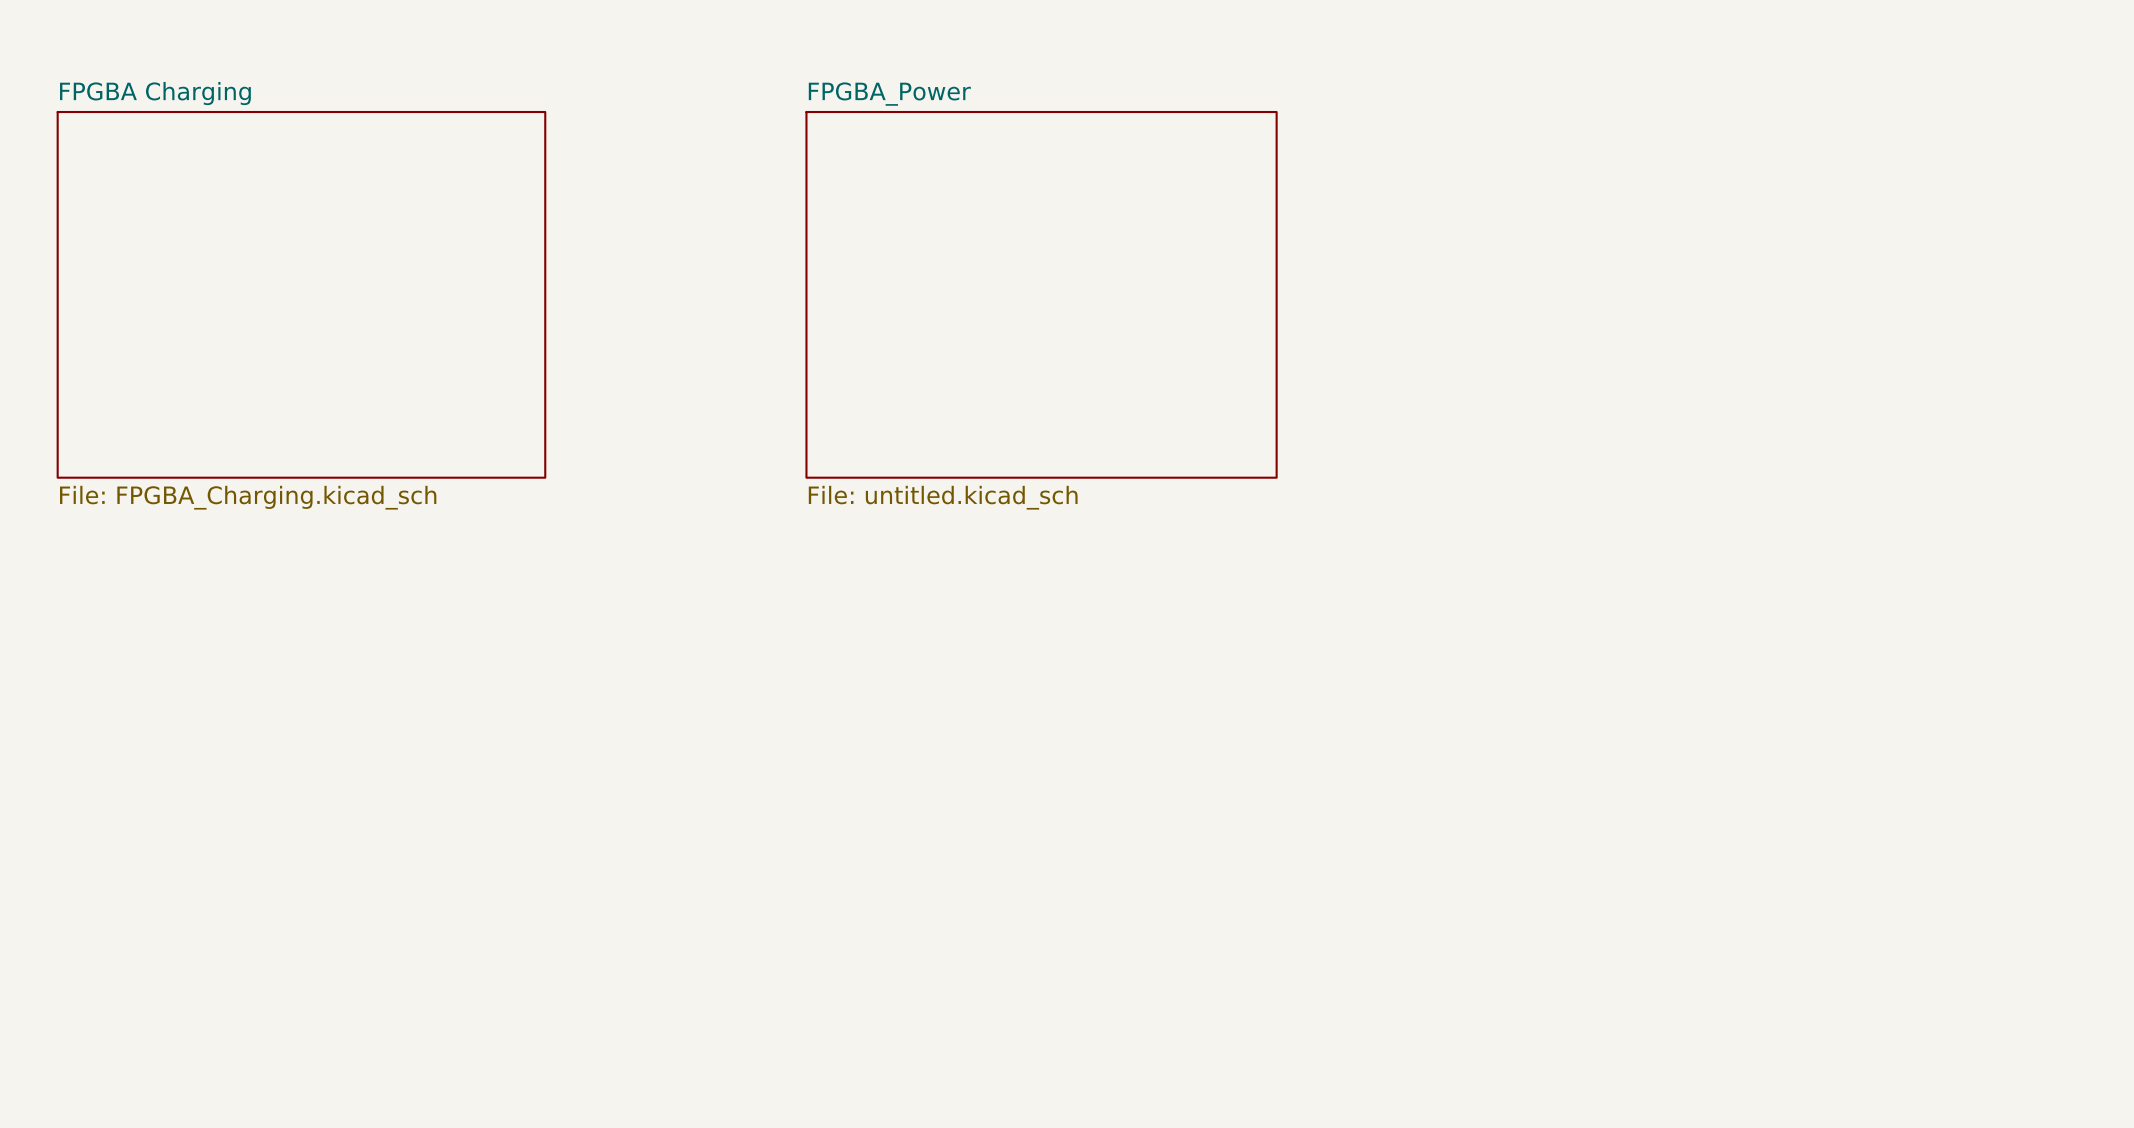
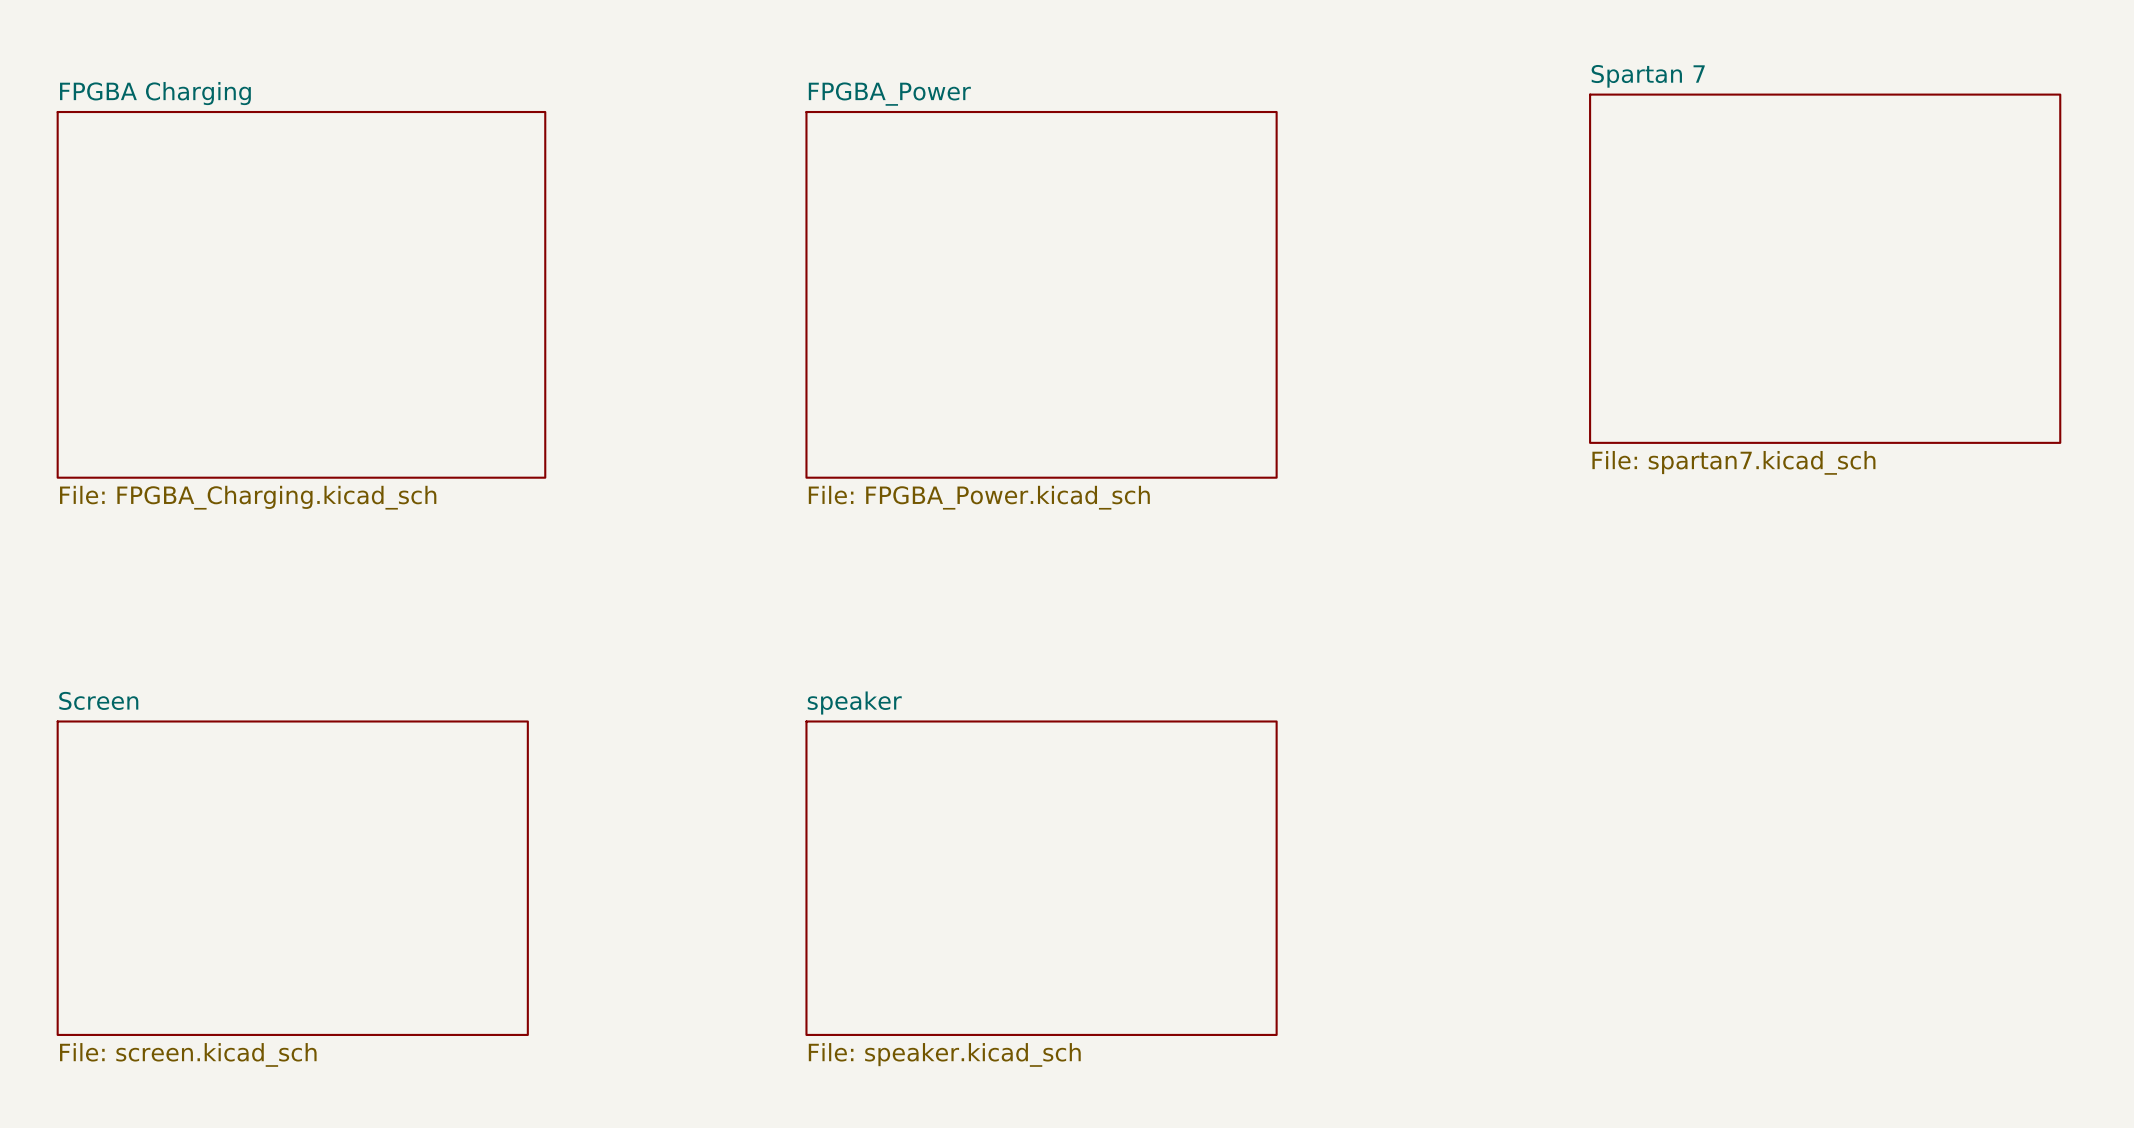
sheet Spartan 7: none -> File: spartan7.kicad_sch (1825, 268)
sheet FPGBA_Power value: File: untitled.kicad_sch (943, 497) -> File: FPGBA_Power.kicad_sch (979, 497)
sheet Screen: none -> File: screen.kicad_sch (292, 878)
sheet speaker: none -> File: speaker.kicad_sch (1041, 878)

